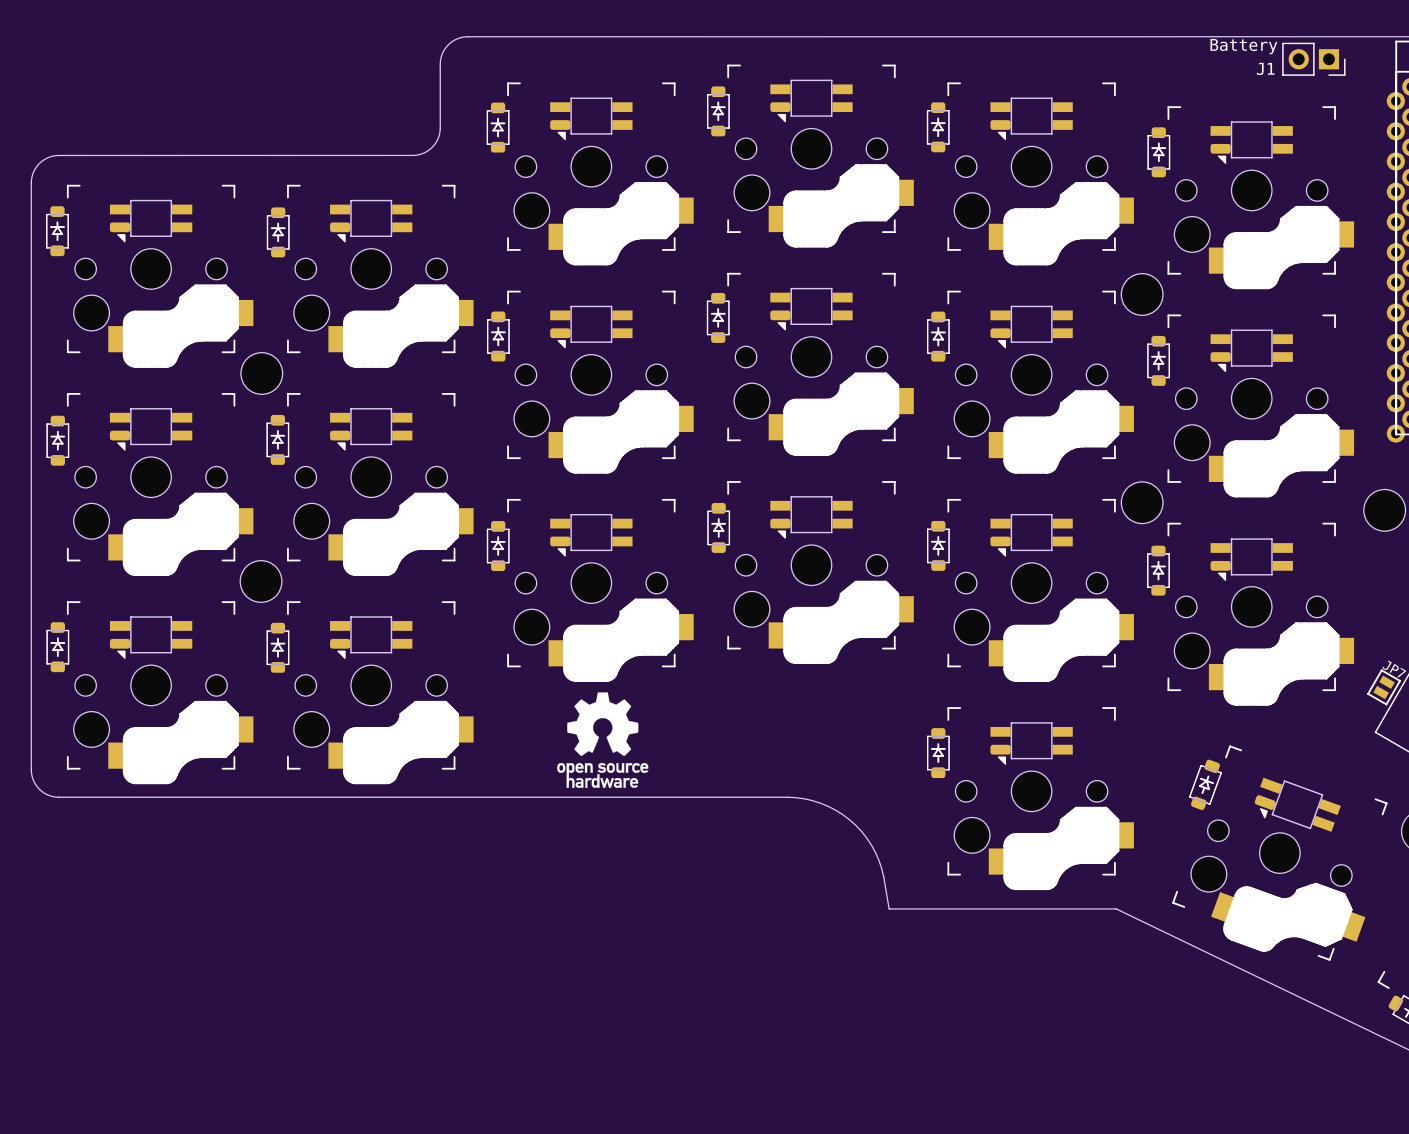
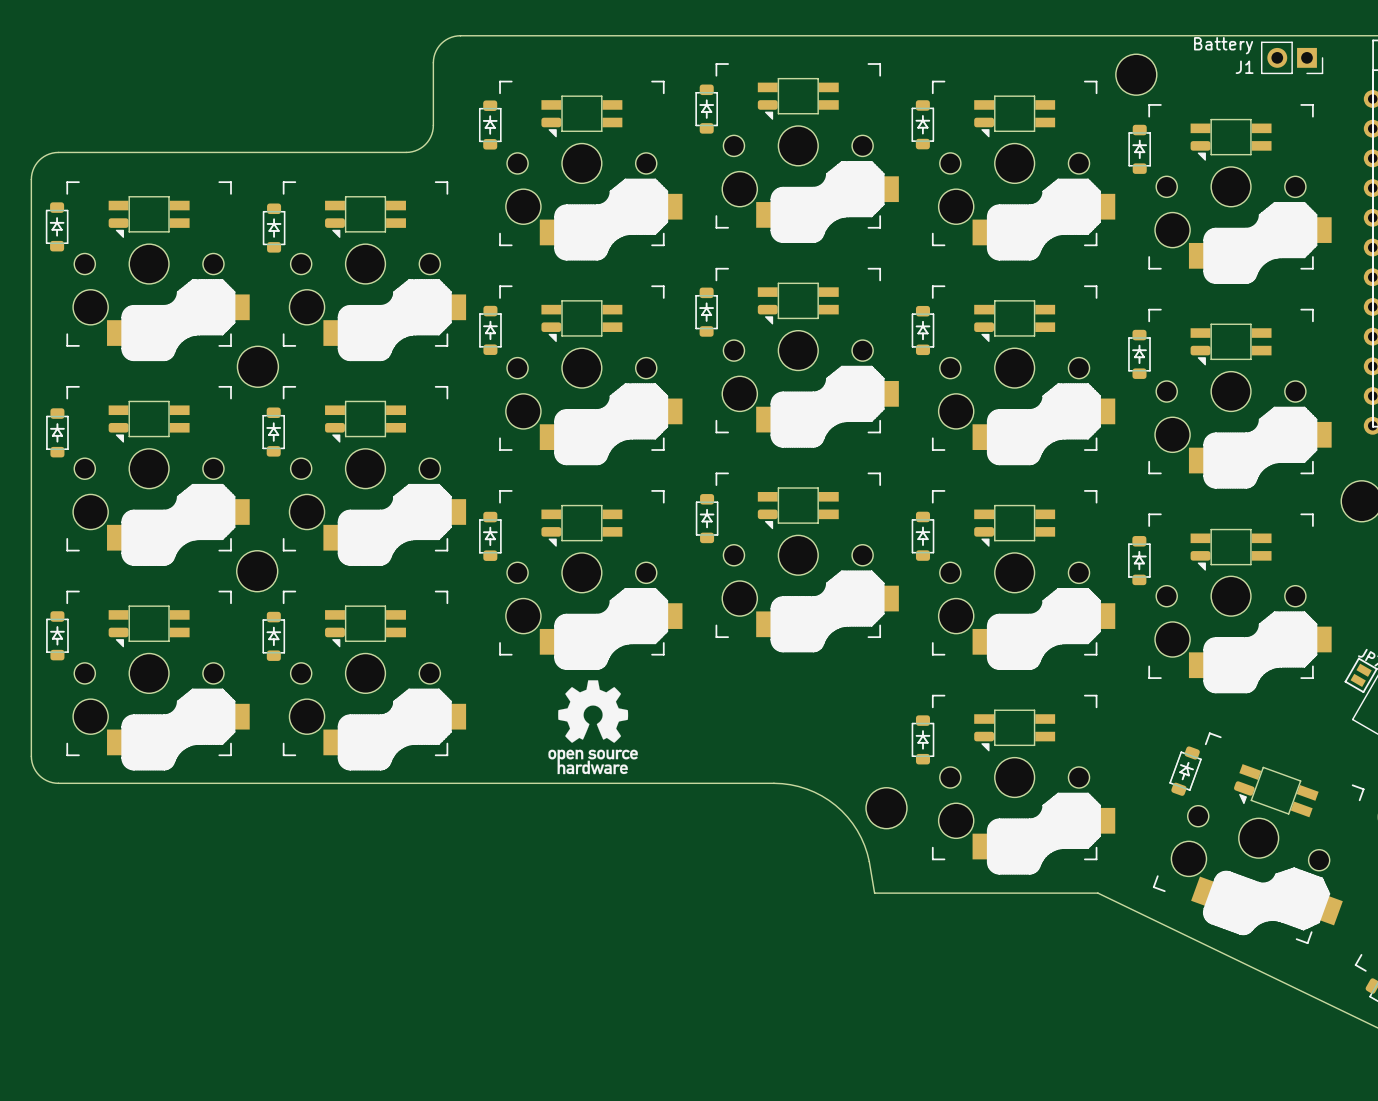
part: none -> (1136, 74)
part: (1142, 294) -> none
part: (1142, 502) -> none
part: none -> (886, 808)

